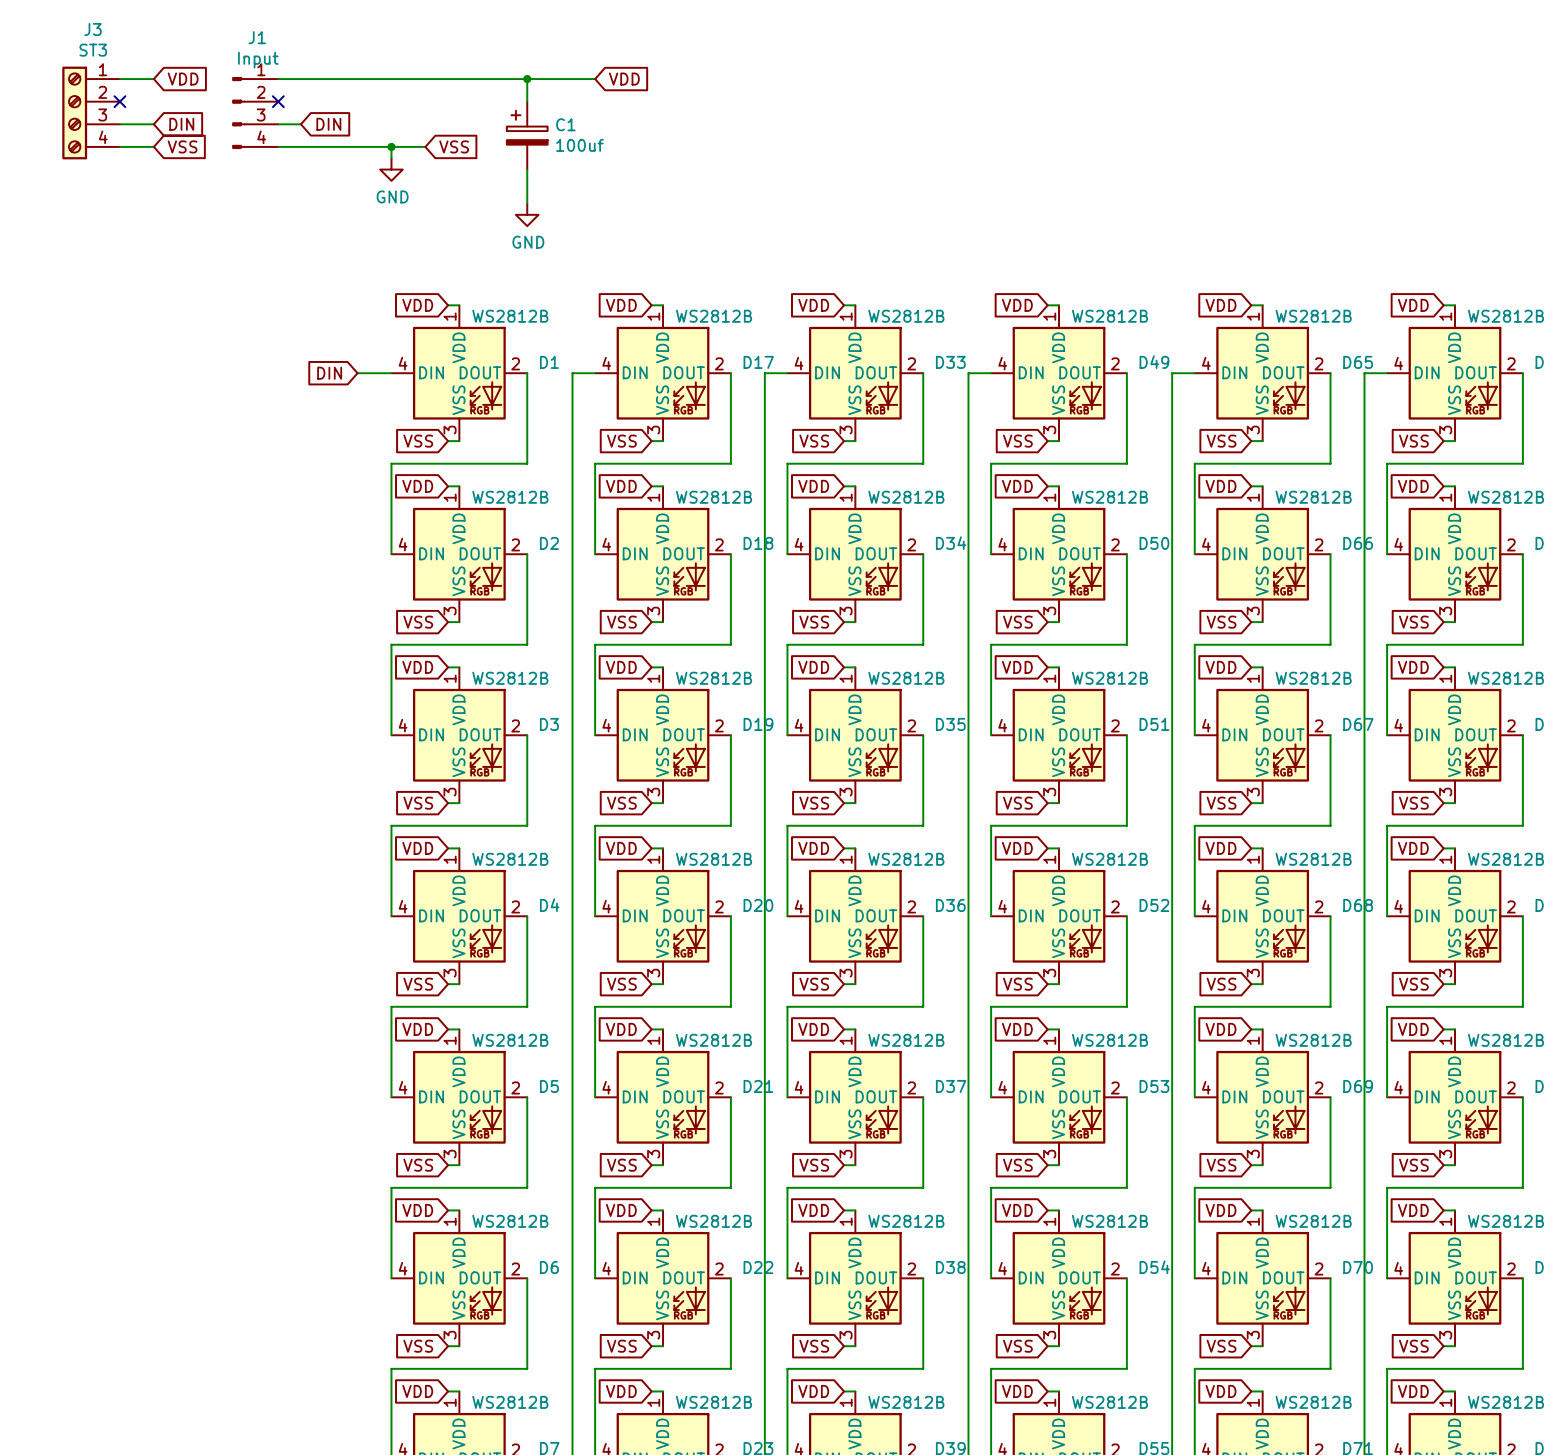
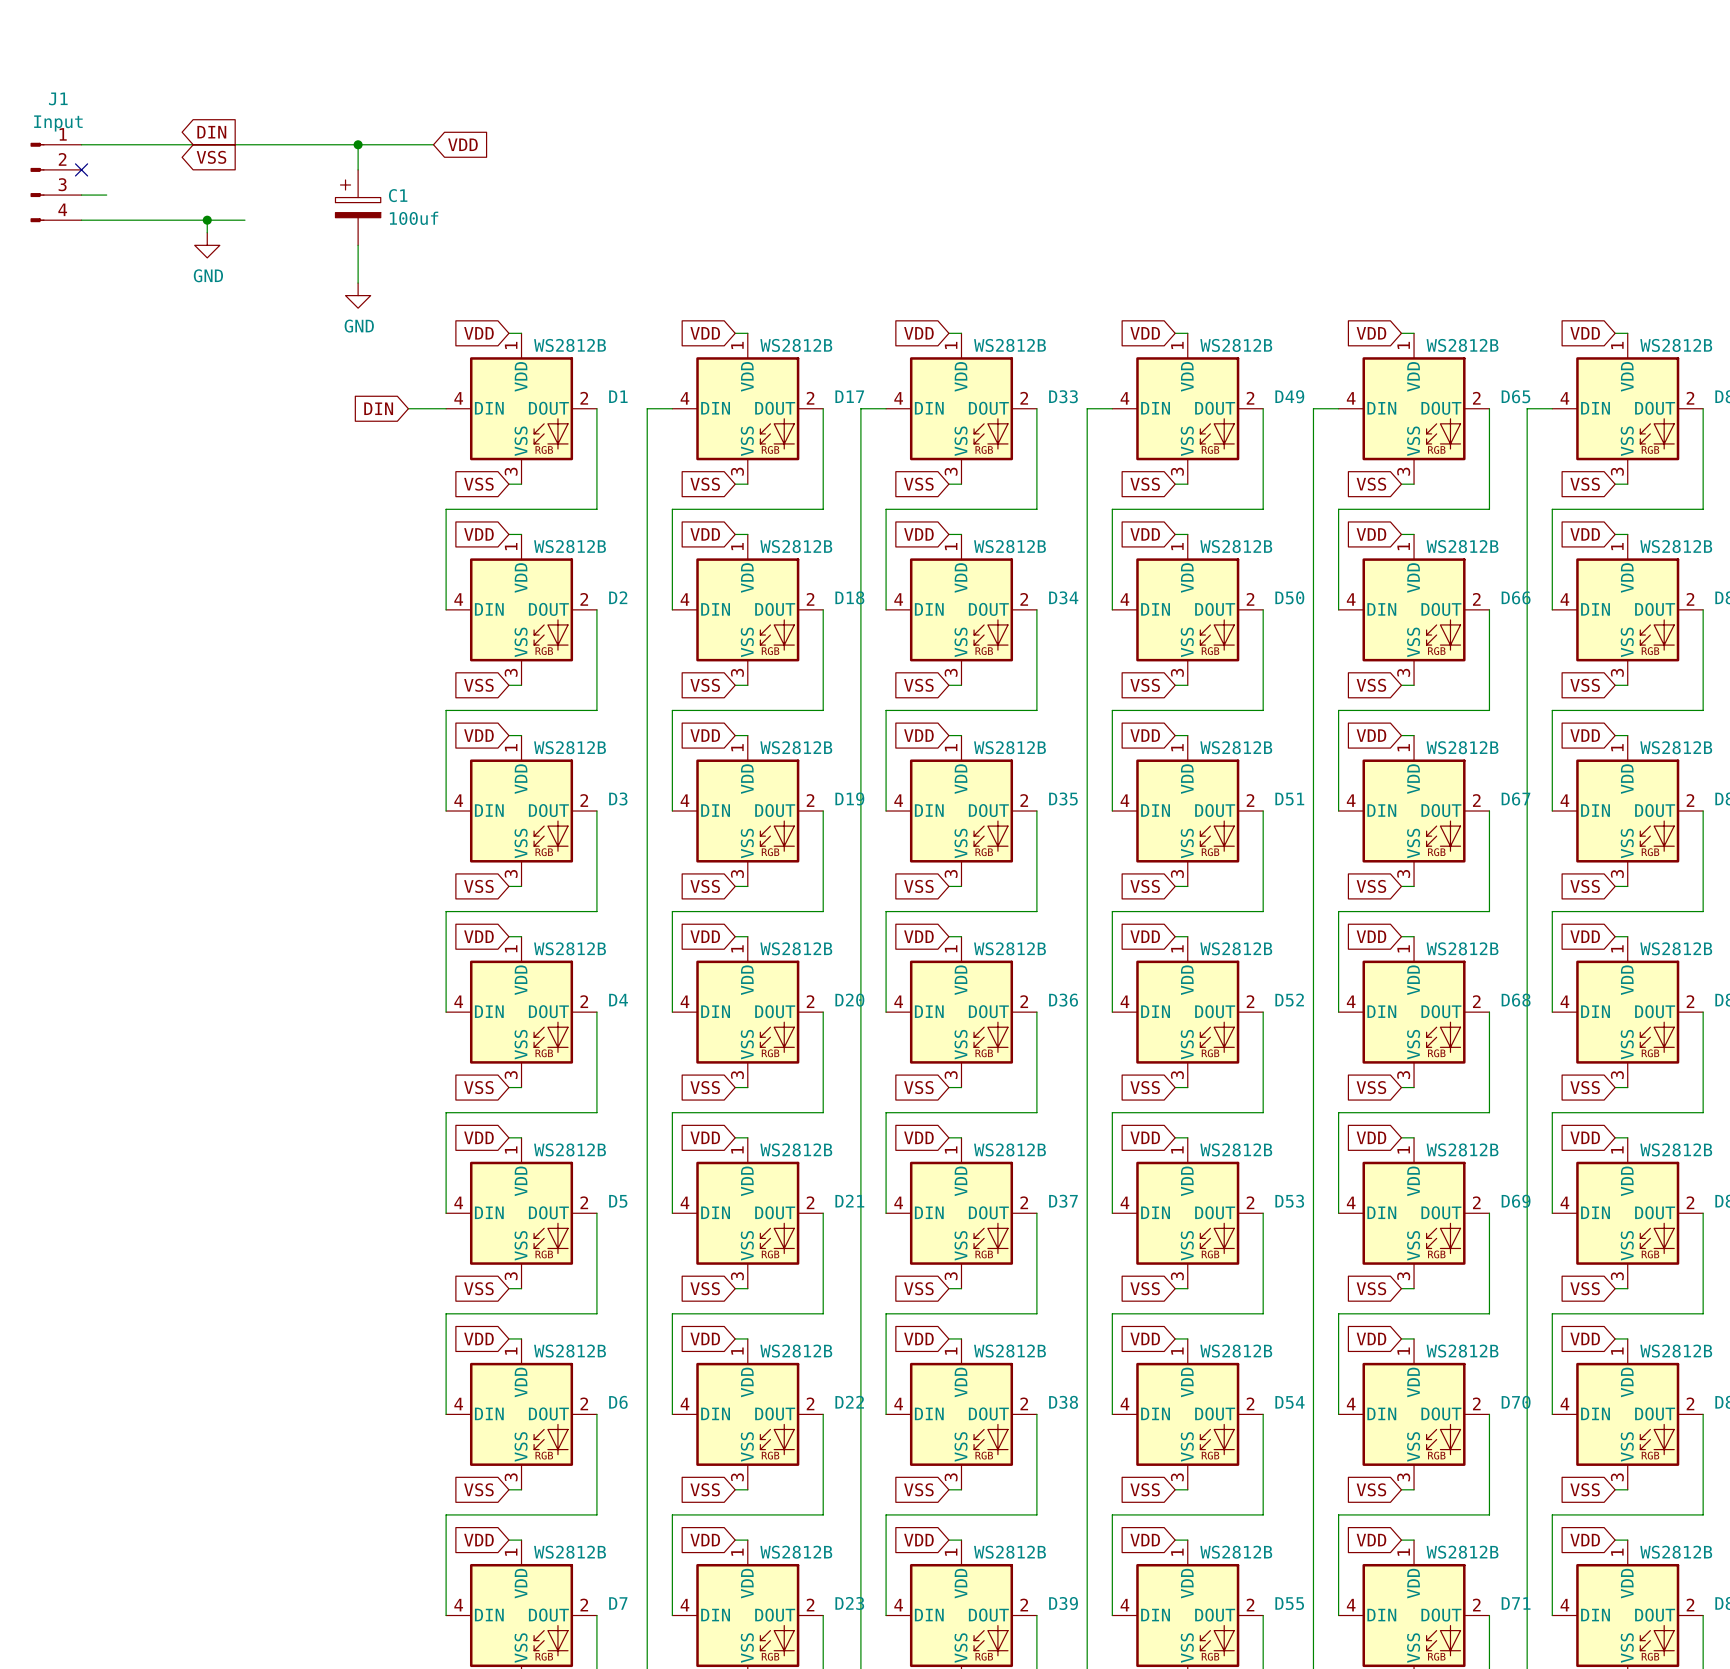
wire: (119, 79) (153, 79) -> none
global label: VDD (183, 79) -> none
wire: (278, 79) (595, 79) -> (81, 144) (433, 144)
wire: (527, 79) (527, 101) -> (358, 144) (358, 169)
junction: (527, 79) -> none
global label: VDD (624, 79) -> none
no-connect mark: (119, 101) -> none
no-connect mark: (278, 101) -> none
J3: ST3 (91, 112) -> none
J1 position: (255, 112) -> (56, 182)
wire: (119, 124) (153, 124) -> none
wire: (278, 124) (300, 124) -> (81, 195) (106, 195)
global label: DIN (328, 124) -> none
junction: none -> (358, 144)
global label: none -> VDD (462, 144)
C1 position: (527, 135) -> (358, 207)
wire: (119, 146) (153, 146) -> none
wire: (278, 146) (425, 146) -> (81, 220) (244, 220)
wire: (391, 146) (391, 158) -> (207, 220) (207, 232)
junction: (391, 146) -> none
global label: VSS (454, 146) -> none
no-connect mark: none -> (81, 169)
power symbol: GND (391, 169) -> none
wire: (527, 169) (527, 203) -> (358, 245) (358, 283)
junction: none -> (207, 220)
power symbol: GND (527, 214) -> none
power symbol: none -> GND (207, 245)
power symbol: none -> GND (358, 295)

